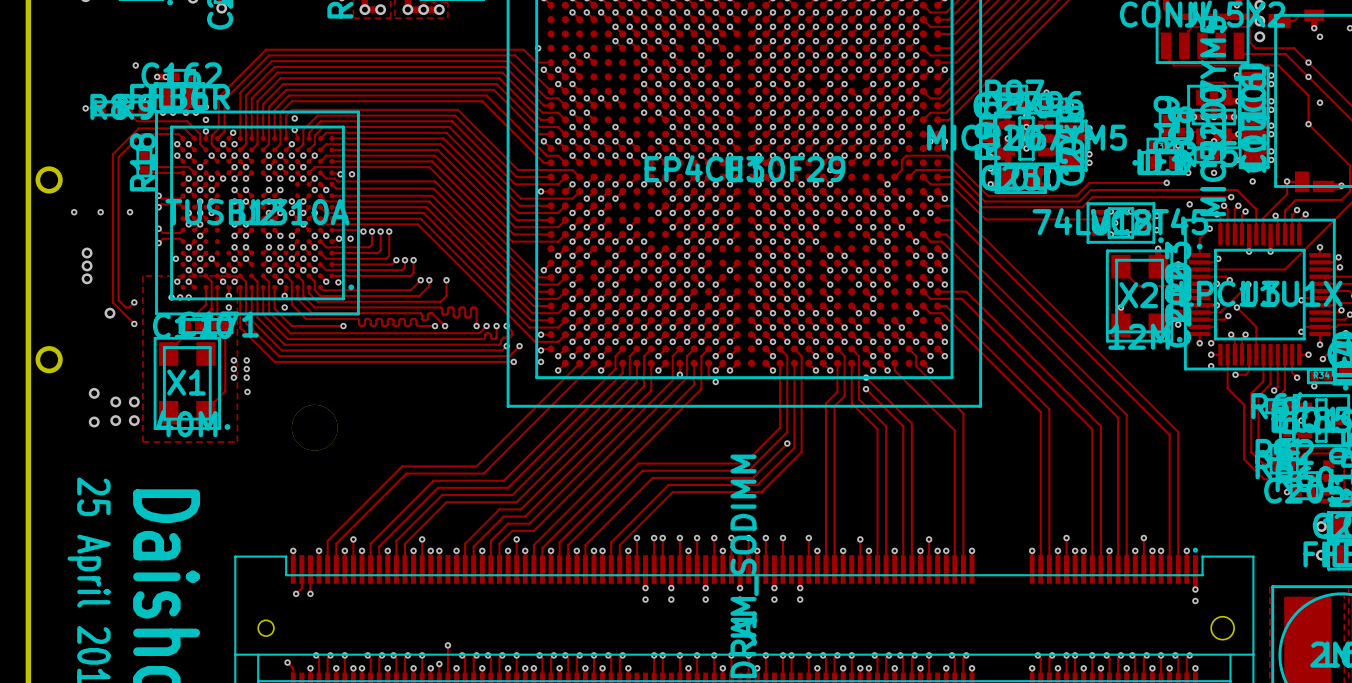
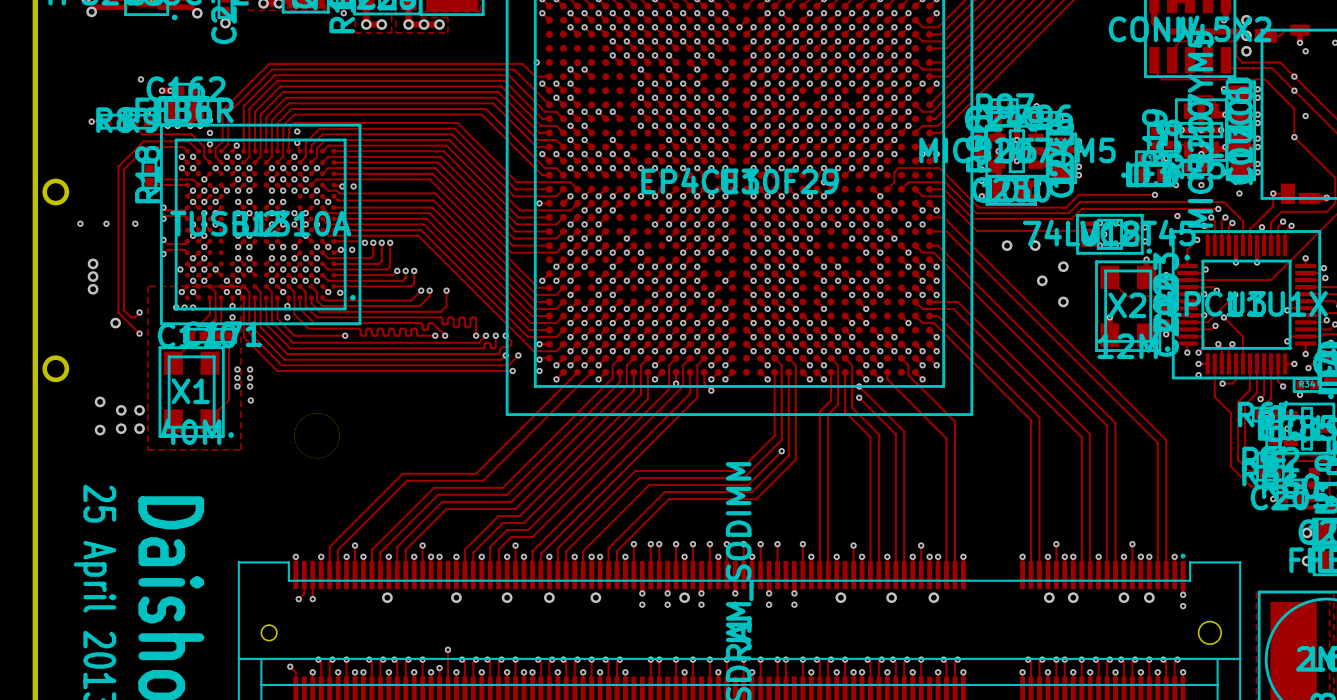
via: none -> (1007, 245)
via: none -> (1035, 245)
via: none -> (1063, 266)
via: none -> (1042, 280)
via: none -> (1063, 301)
via: none -> (387, 597)
via: none -> (456, 597)
via: none -> (507, 597)
via: none -> (549, 597)
via: none -> (595, 597)
via: none -> (684, 597)
via: none -> (840, 597)
via: none -> (891, 597)
via: none -> (933, 597)
via: none -> (1049, 597)
via: none -> (1073, 597)
via: none -> (1123, 597)
via: none -> (1149, 597)

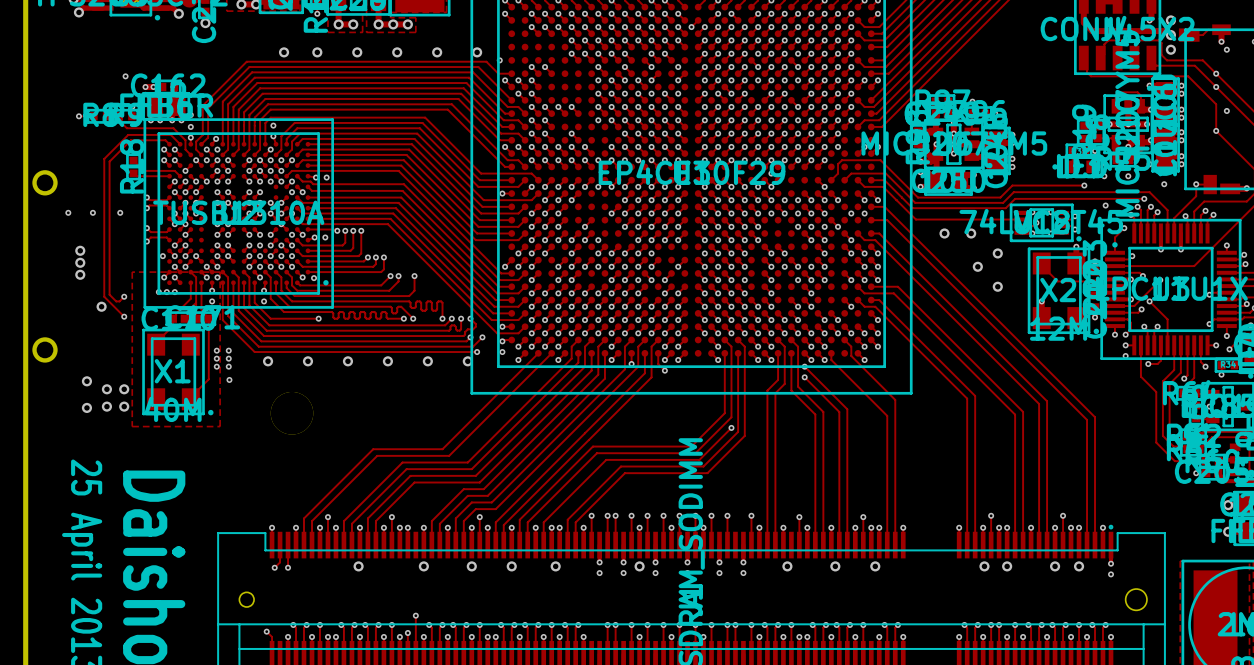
via: none -> (284, 52)
via: none -> (317, 52)
via: none -> (357, 52)
via: none -> (397, 52)
via: none -> (437, 52)
via: none -> (477, 52)
via: none -> (268, 361)
via: none -> (307, 361)
via: none -> (347, 361)
via: none -> (387, 361)
via: none -> (427, 361)
via: none -> (467, 361)

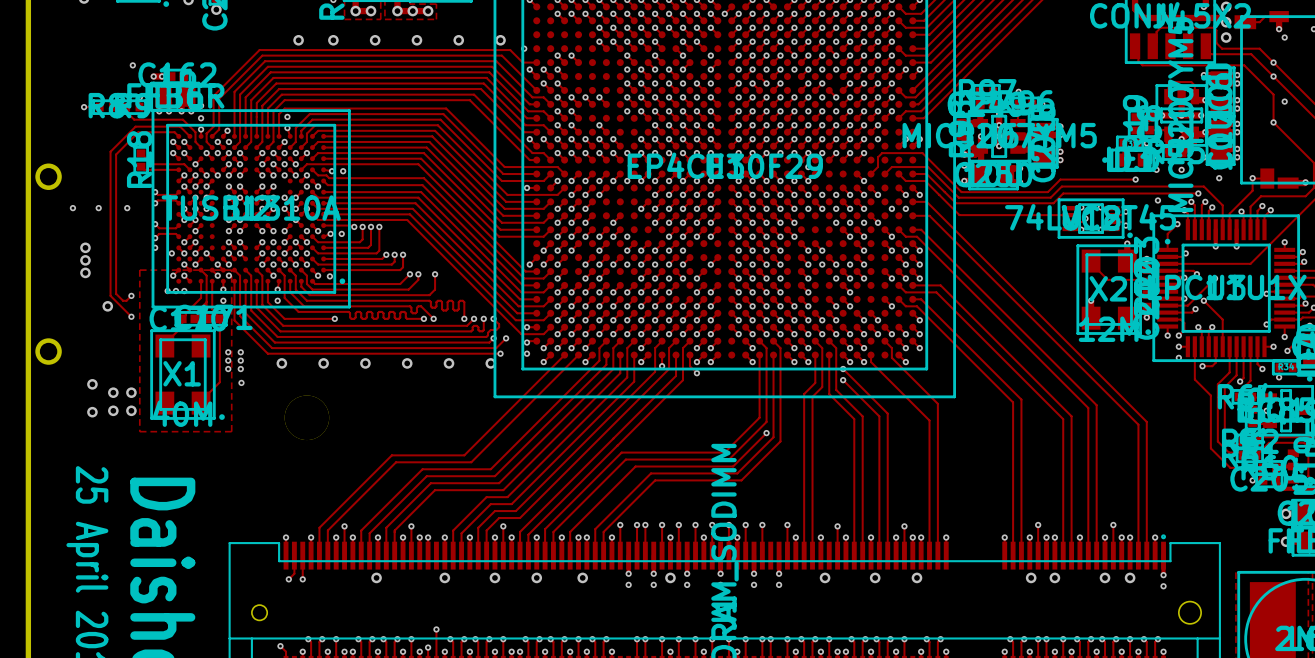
via: (944, 233) -> none
via: (971, 233) -> none
via: none -> (155, 247)
via: (997, 253) -> none
via: (977, 266) -> none
via: (997, 286) -> none

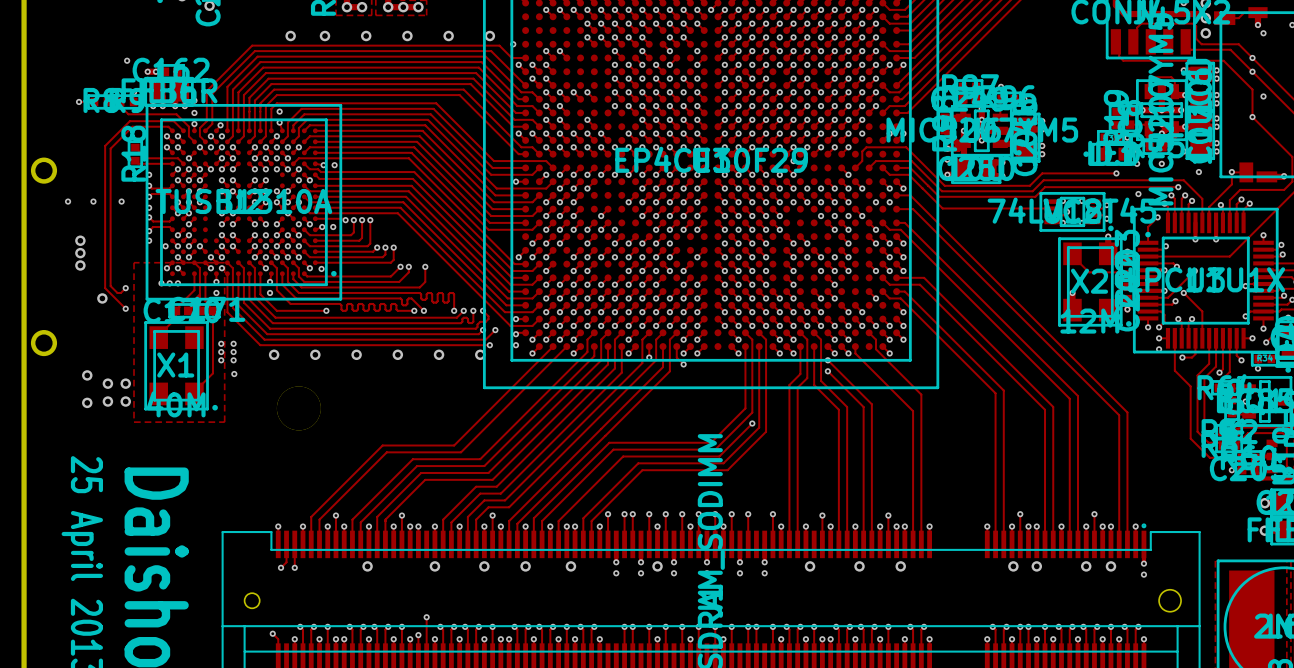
via: none -> (149, 174)
via: none -> (149, 207)

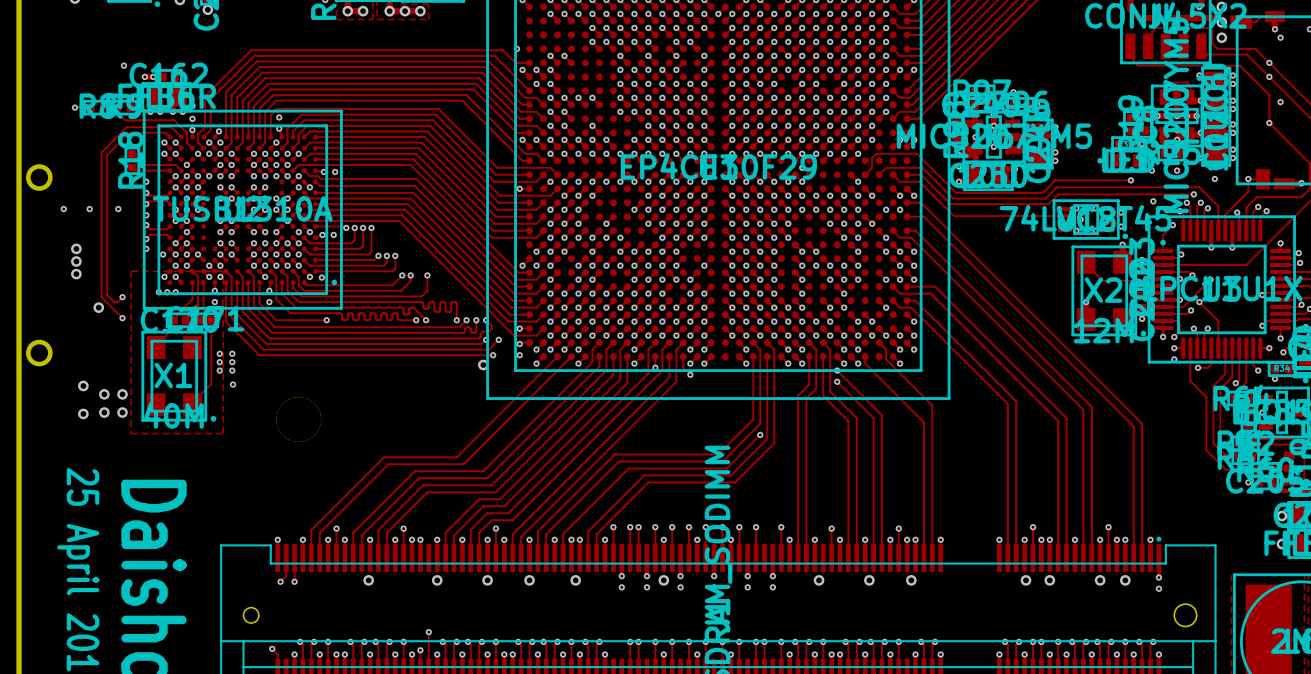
via: (290, 36) -> none
via: (324, 36) -> none
via: (366, 36) -> none
via: (407, 36) -> none
via: (448, 36) -> none
via: (489, 36) -> none
via: (274, 354) -> none
via: (315, 354) -> none
via: (356, 354) -> none
via: (397, 354) -> none
via: (439, 354) -> none

